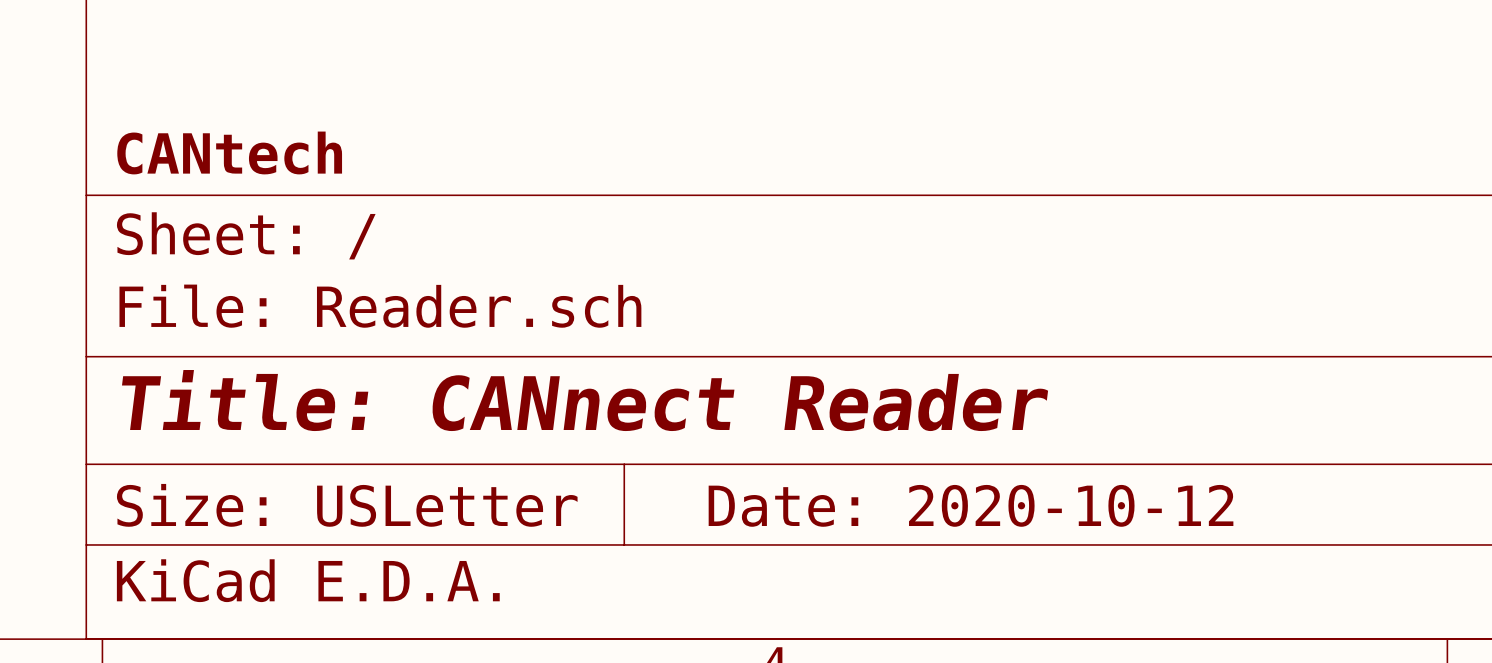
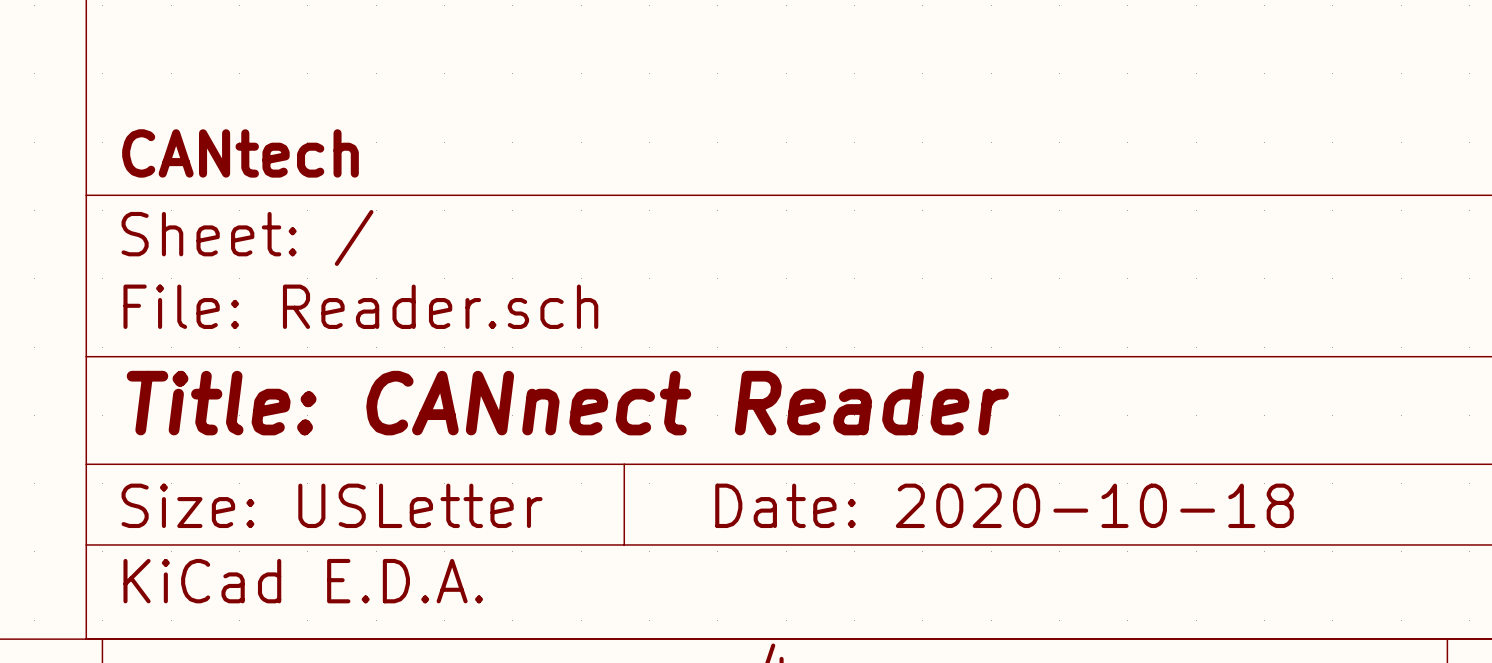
title block: Date: 2020-10-12 (971, 505) -> Date: 2020-10-18 (1004, 505)

